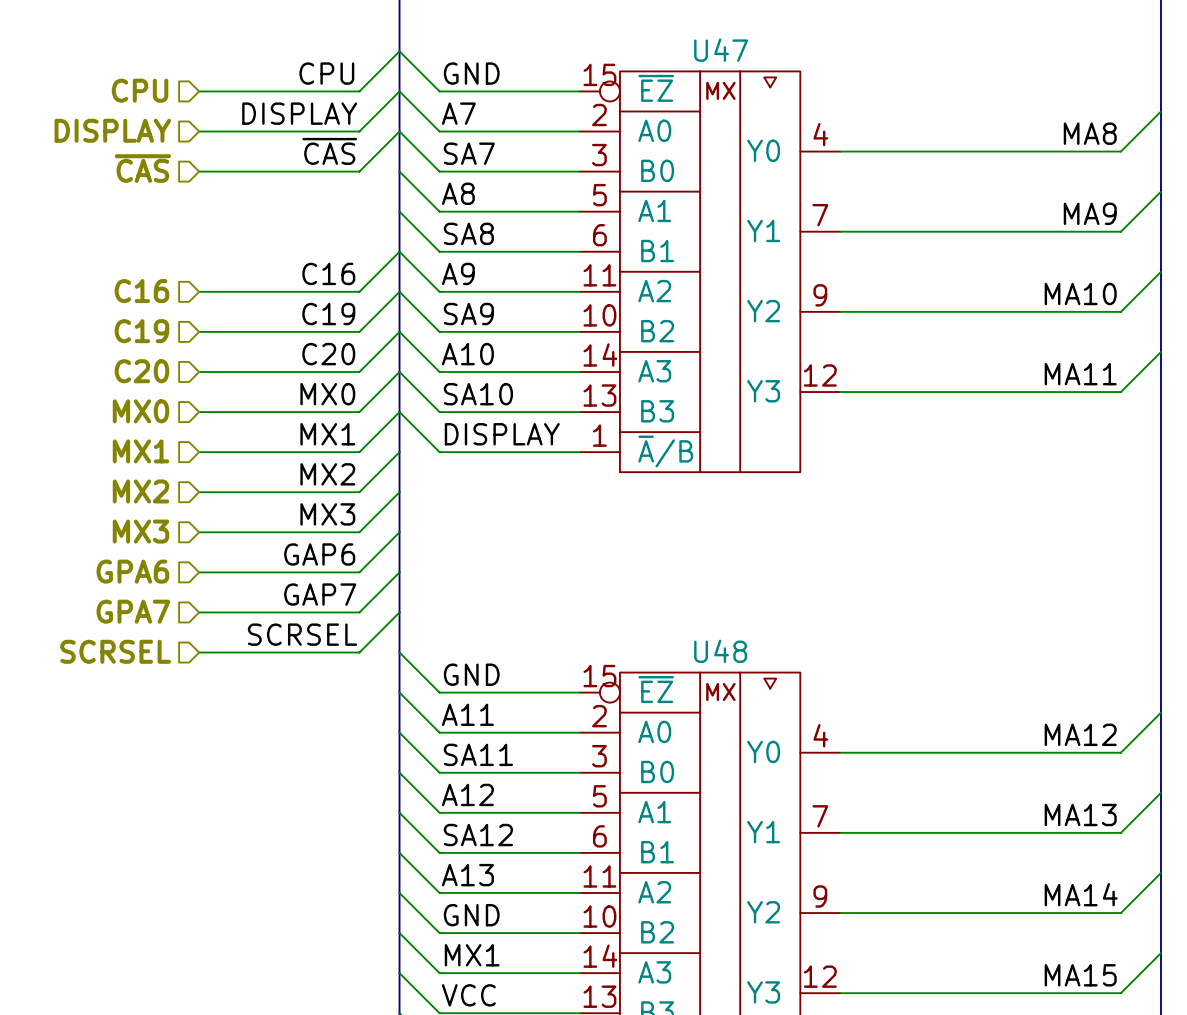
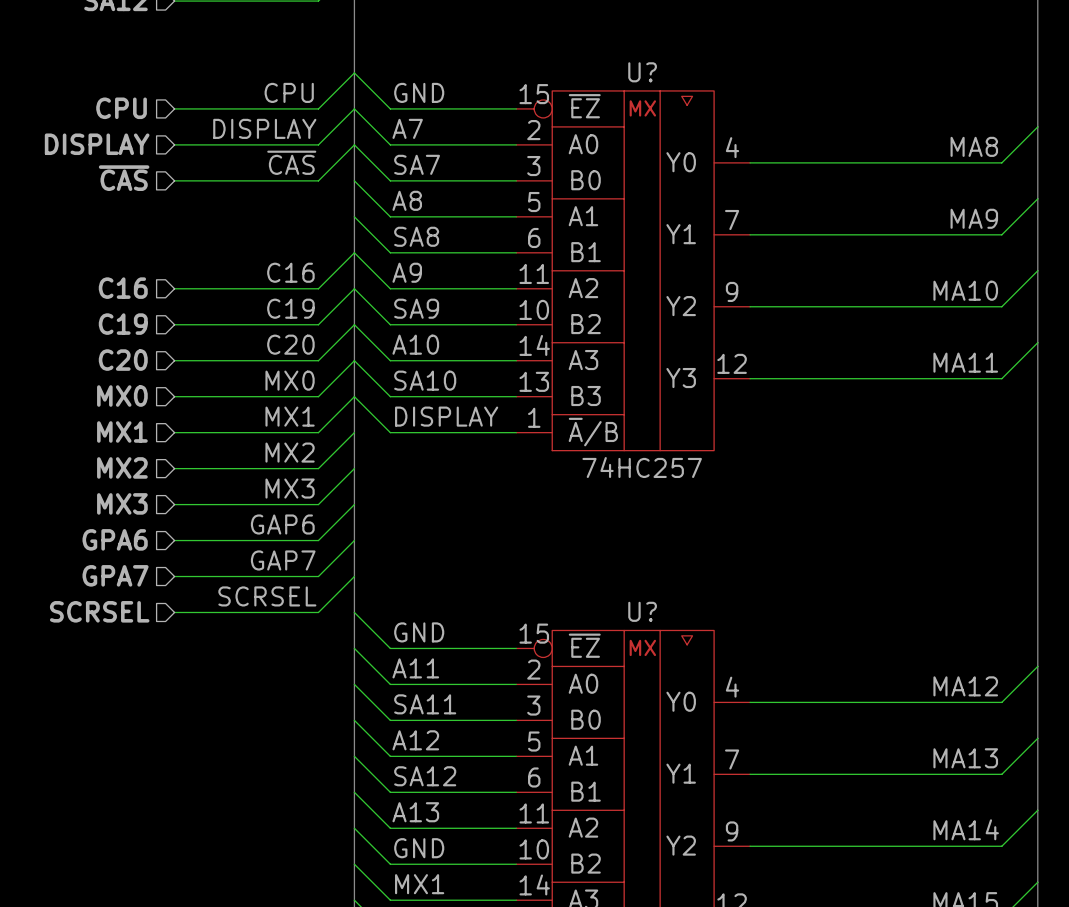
U47 name: U47 (721, 50) -> U? (642, 72)
U47 value: none -> 74HC257 (642, 467)
U48 name: U48 (720, 651) -> U? (642, 611)

